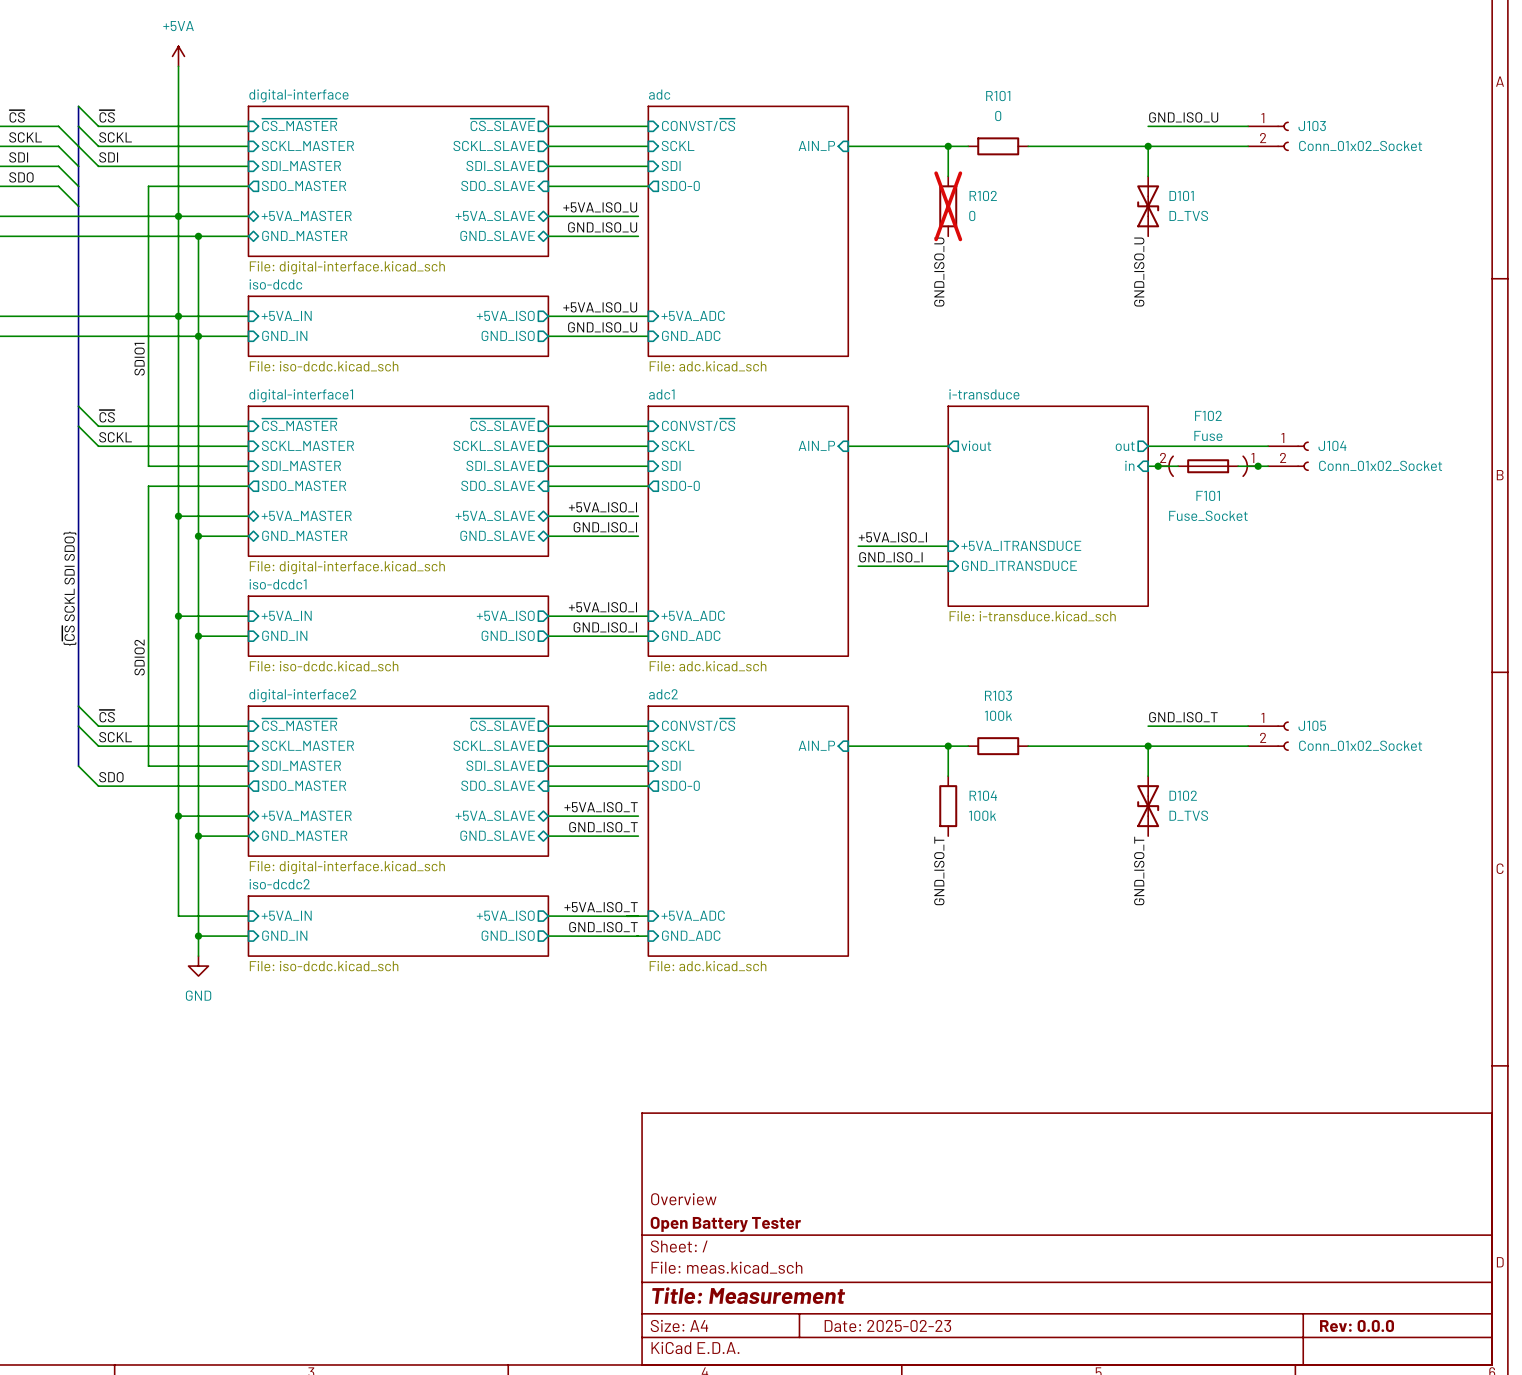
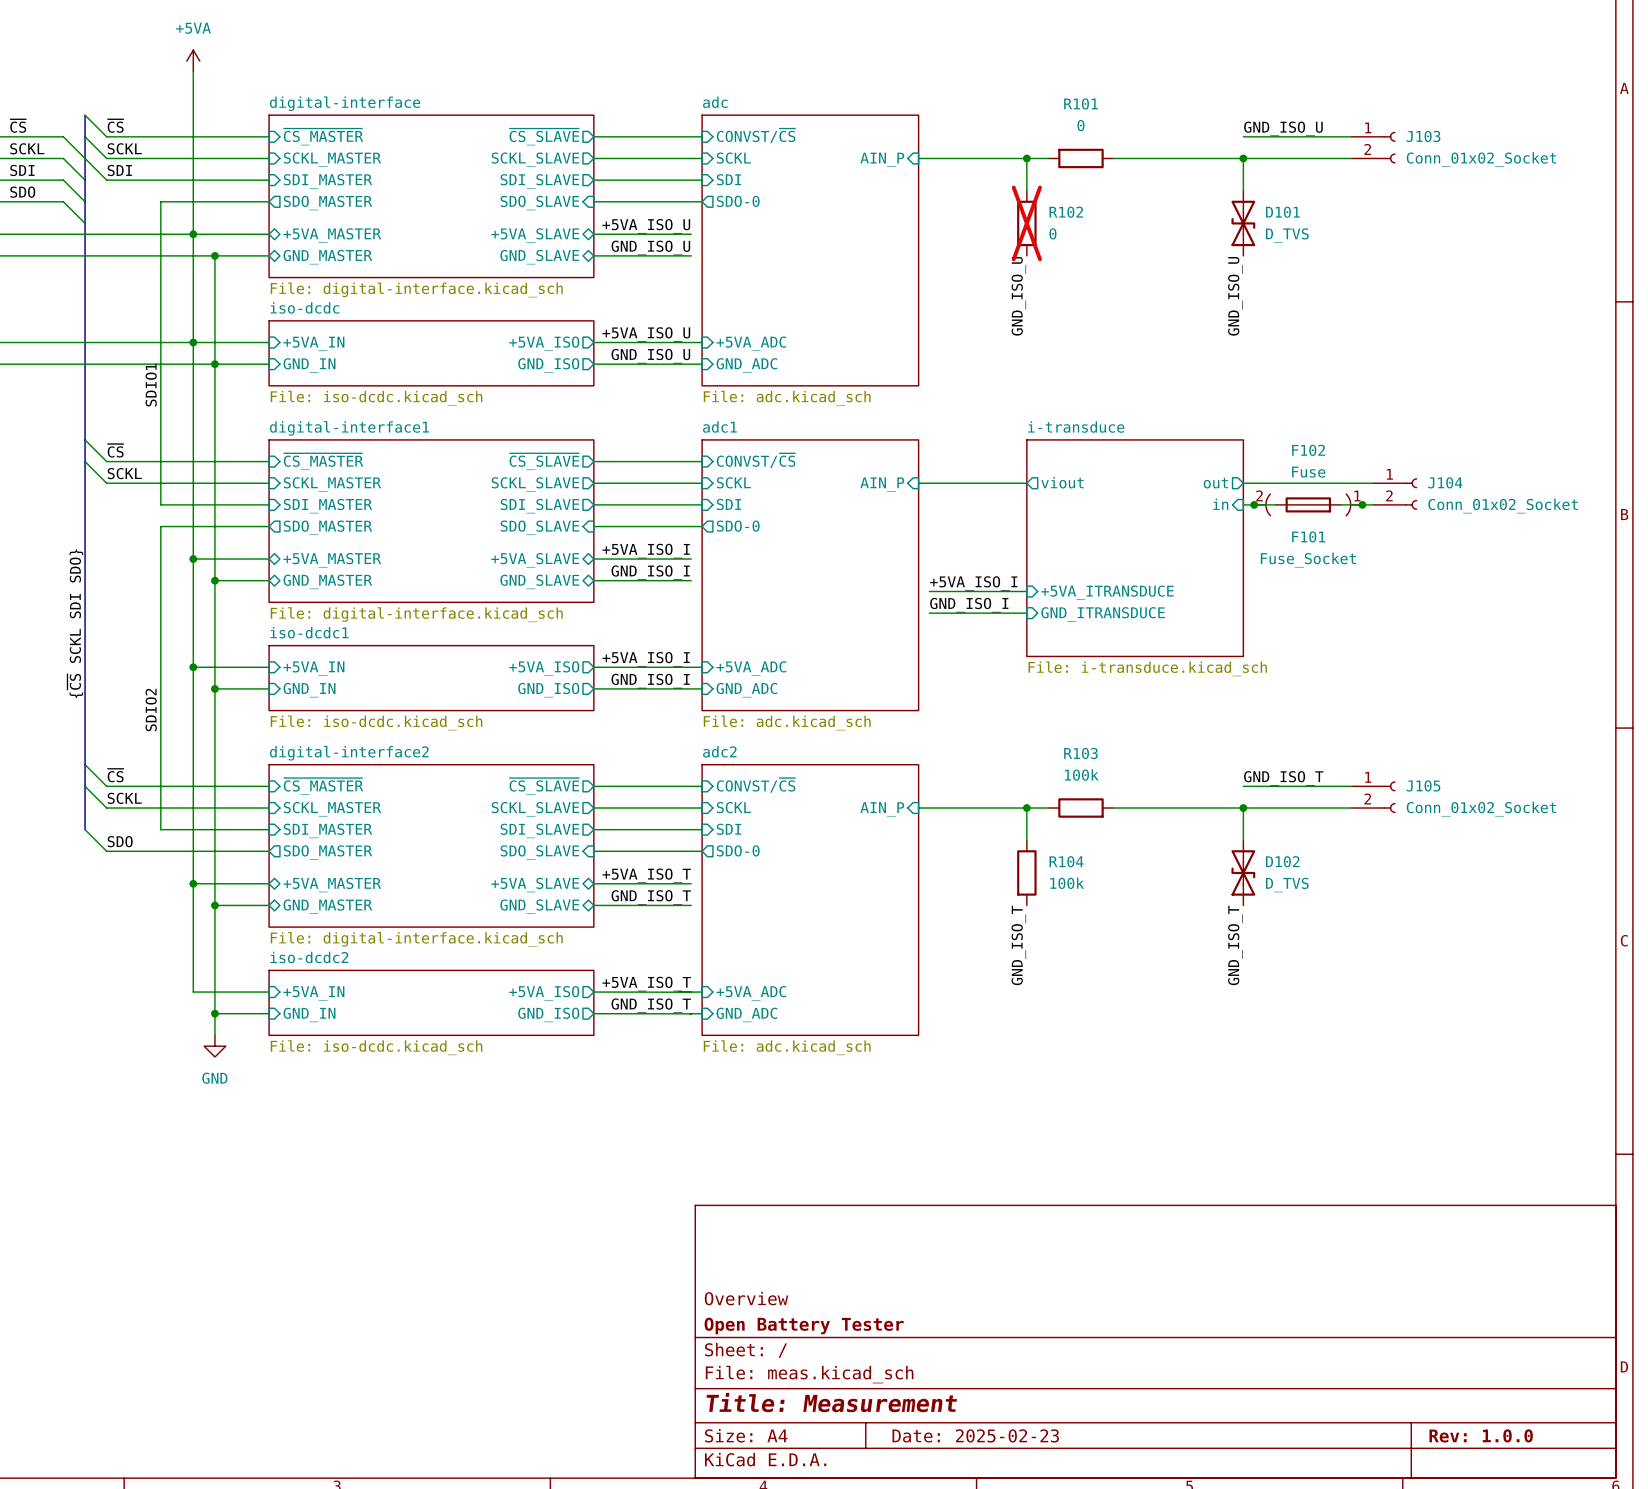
title block: Rev: 0.0.0 (1357, 1326) -> Rev: 1.0.0 (1481, 1435)

